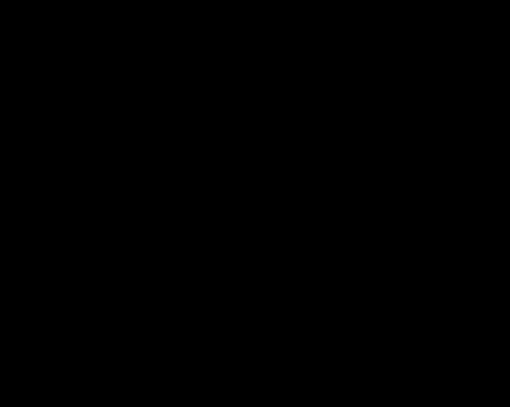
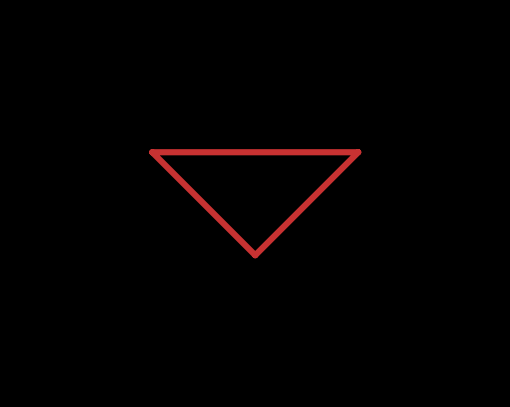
power symbol: none -> (255, 203)

